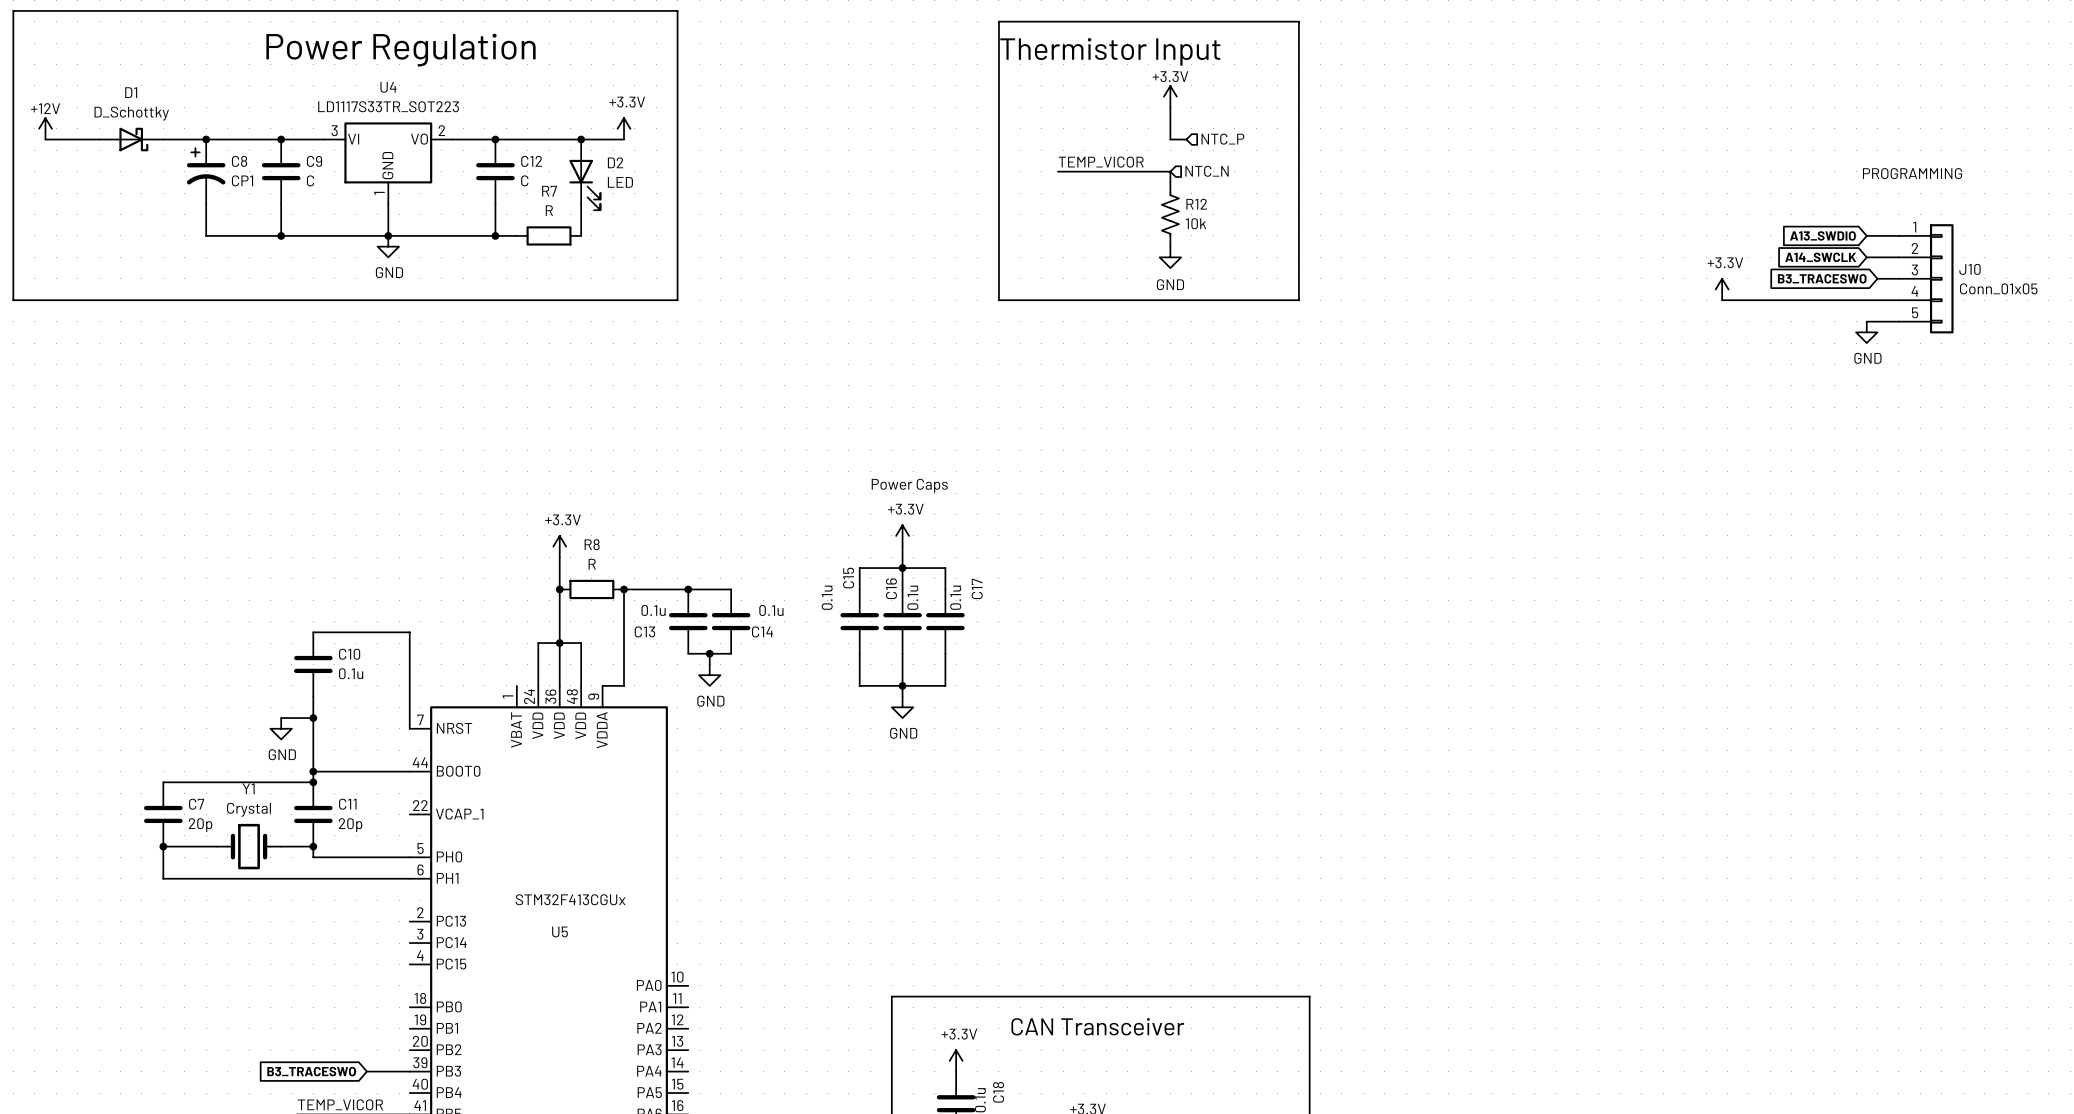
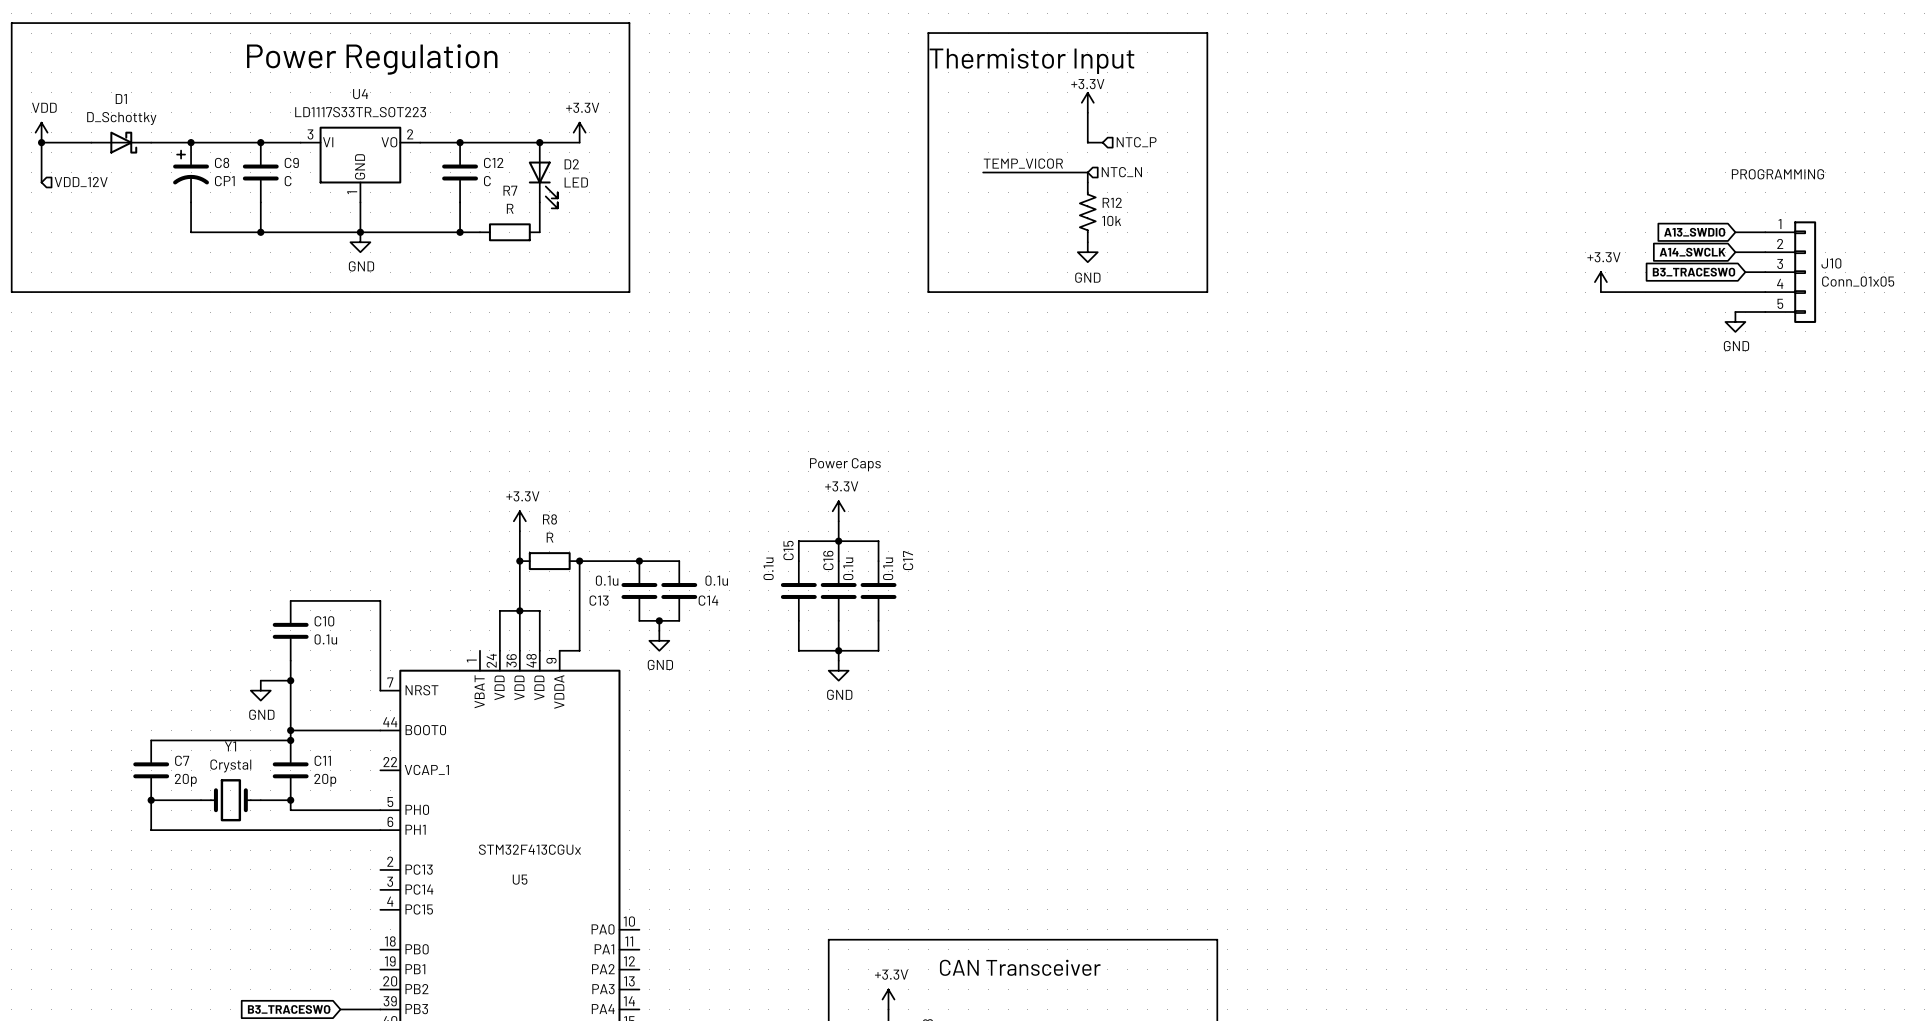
power symbol: +12V (45, 128) -> VDD (41, 132)
wire: none -> (41, 142) (41, 182)
junction: none -> (41, 142)
hierarchical label: none -> VDD_12V (81, 182)

